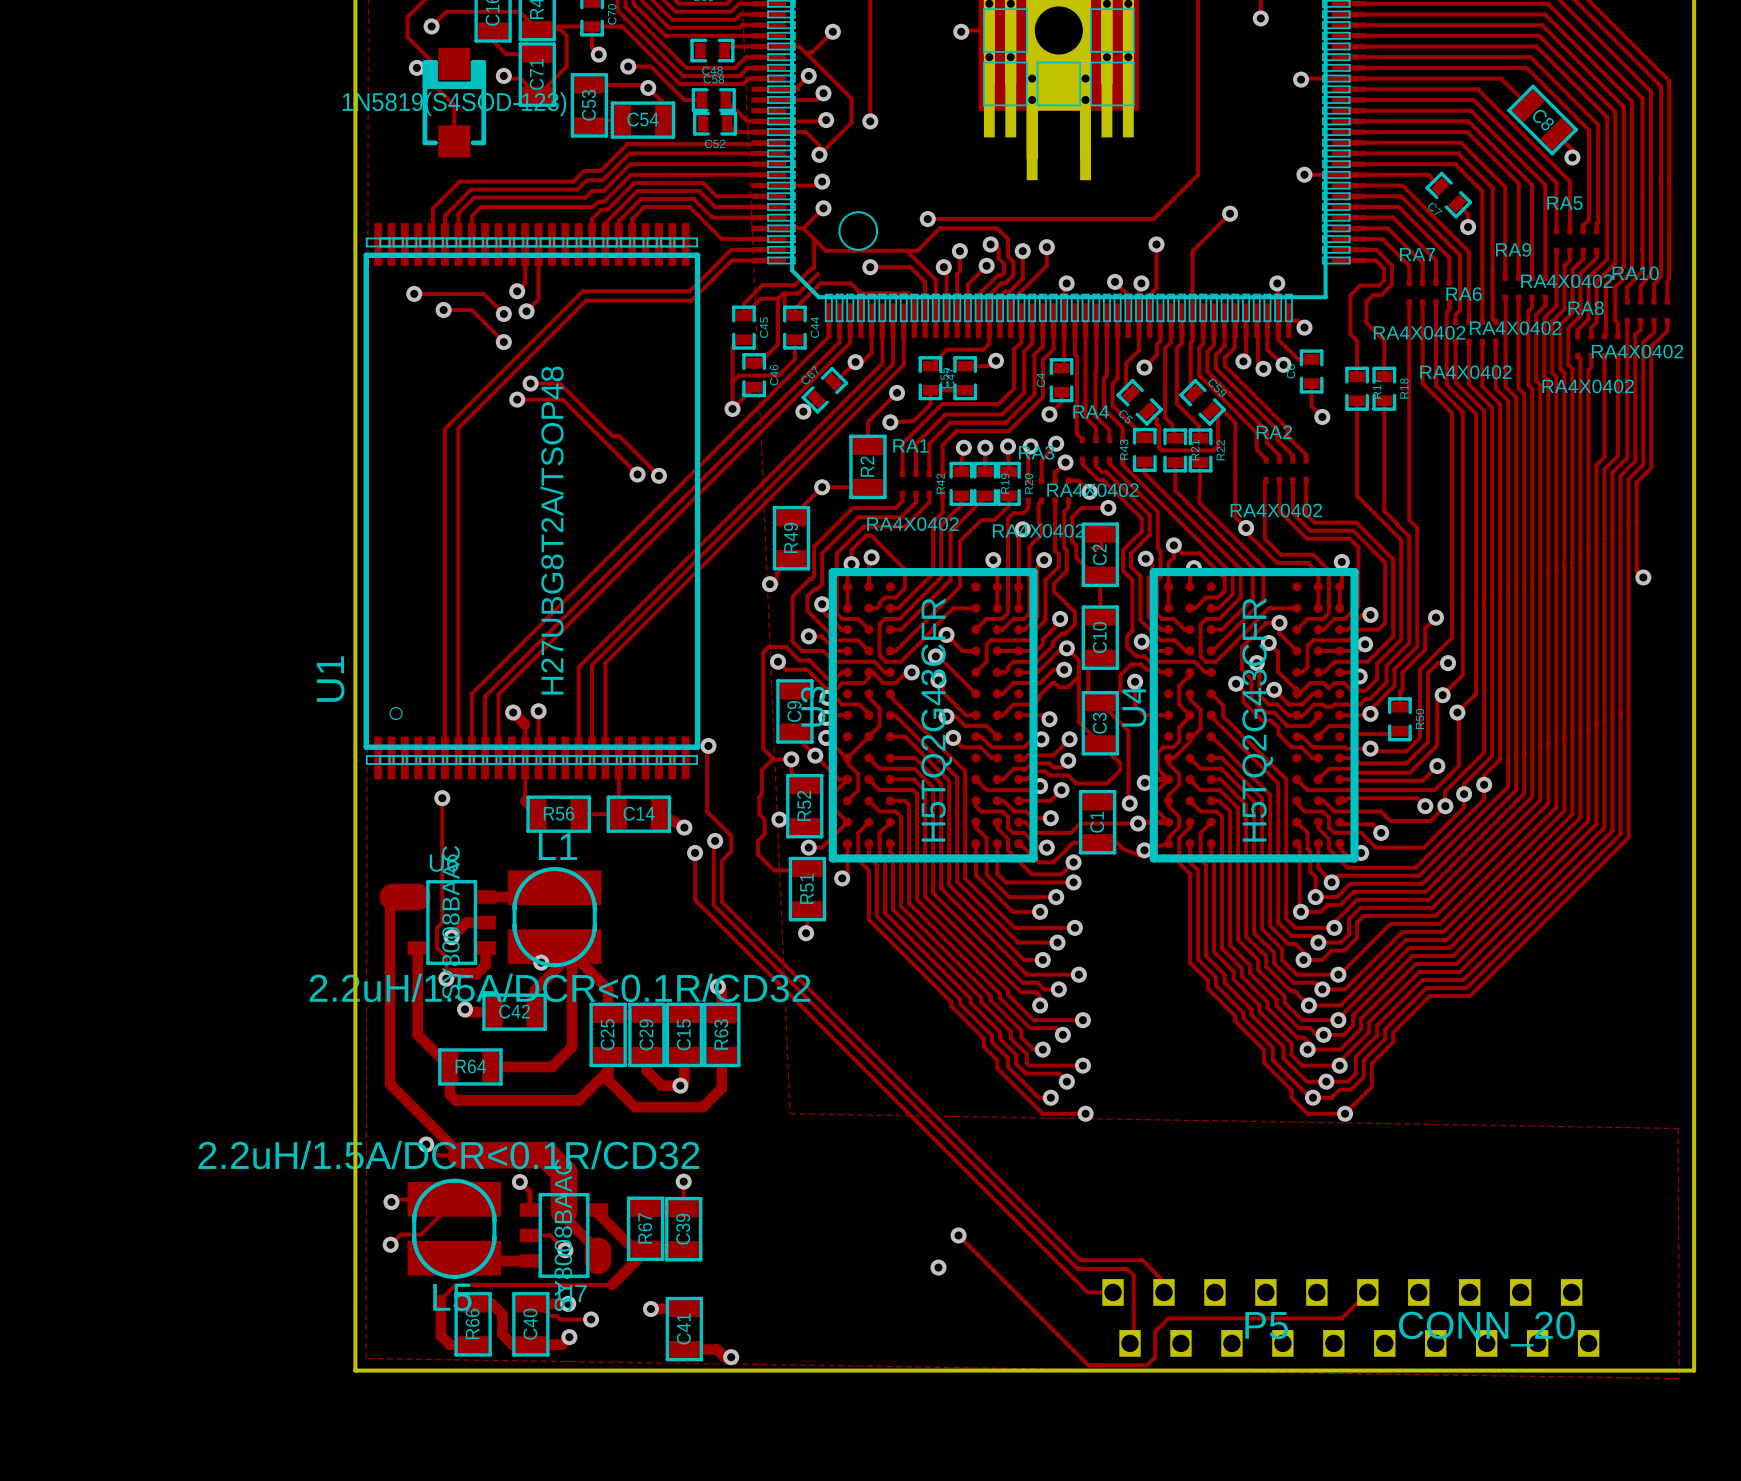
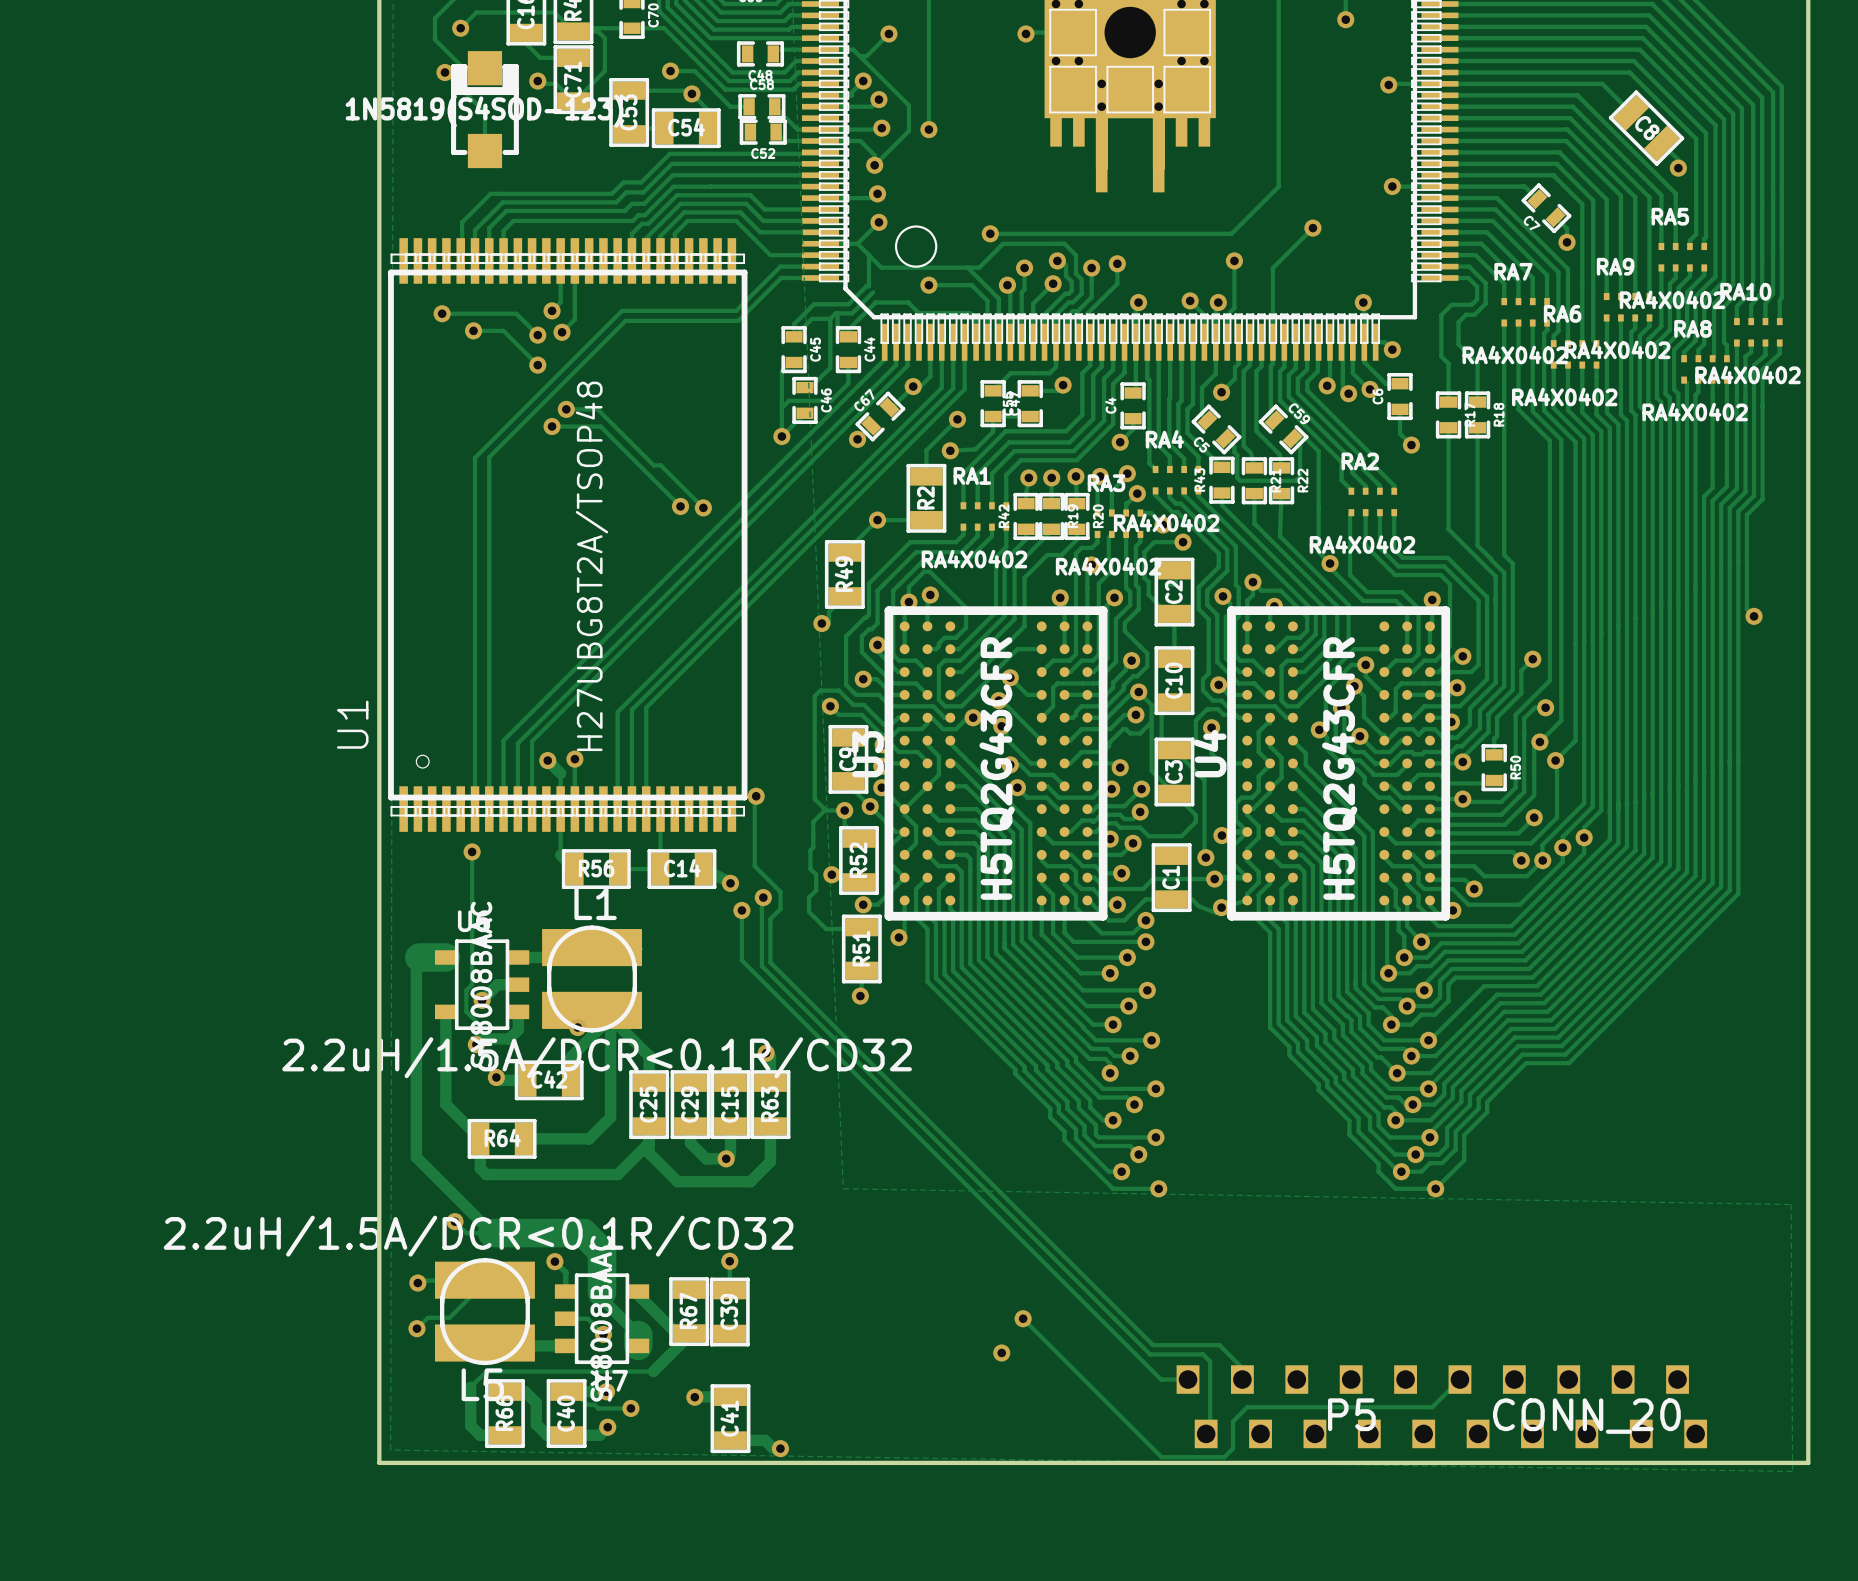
track: (592, 26) (592, 47) (598, 54) -> none
via: (598, 54) -> none

